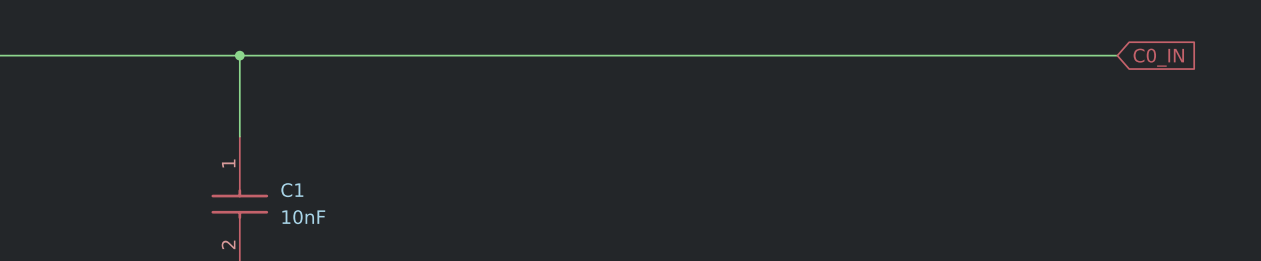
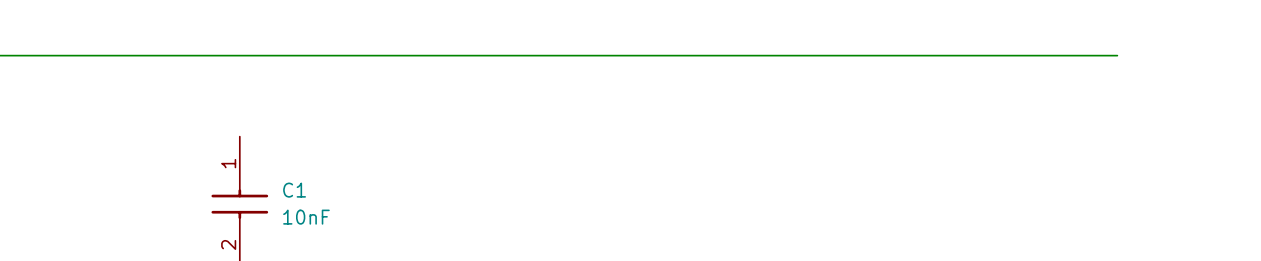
wire: (239, 55) (239, 136) -> none
junction: (239, 55) -> none
global label: C0_IN (1158, 57) -> none

